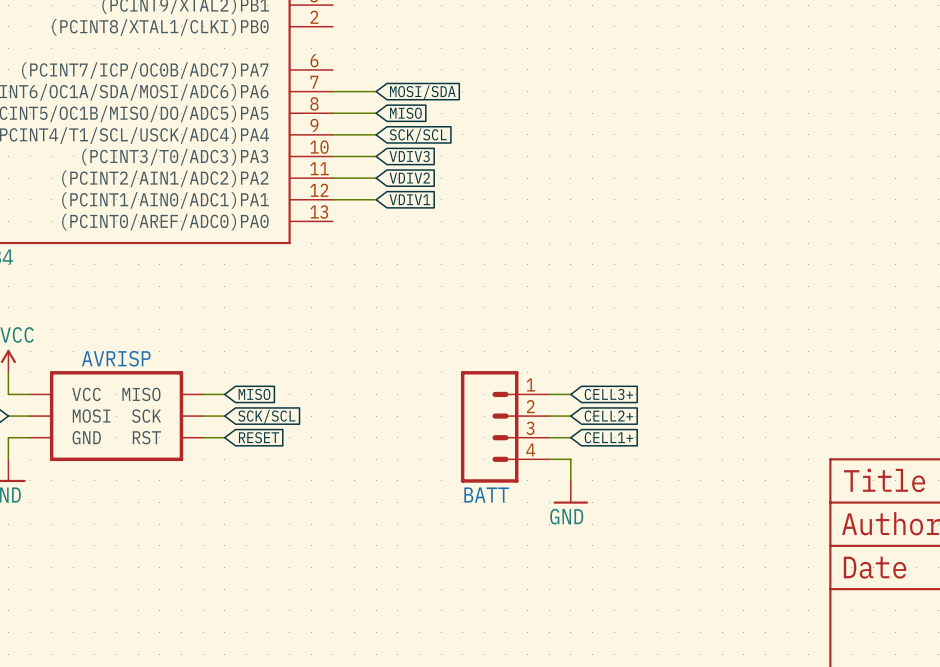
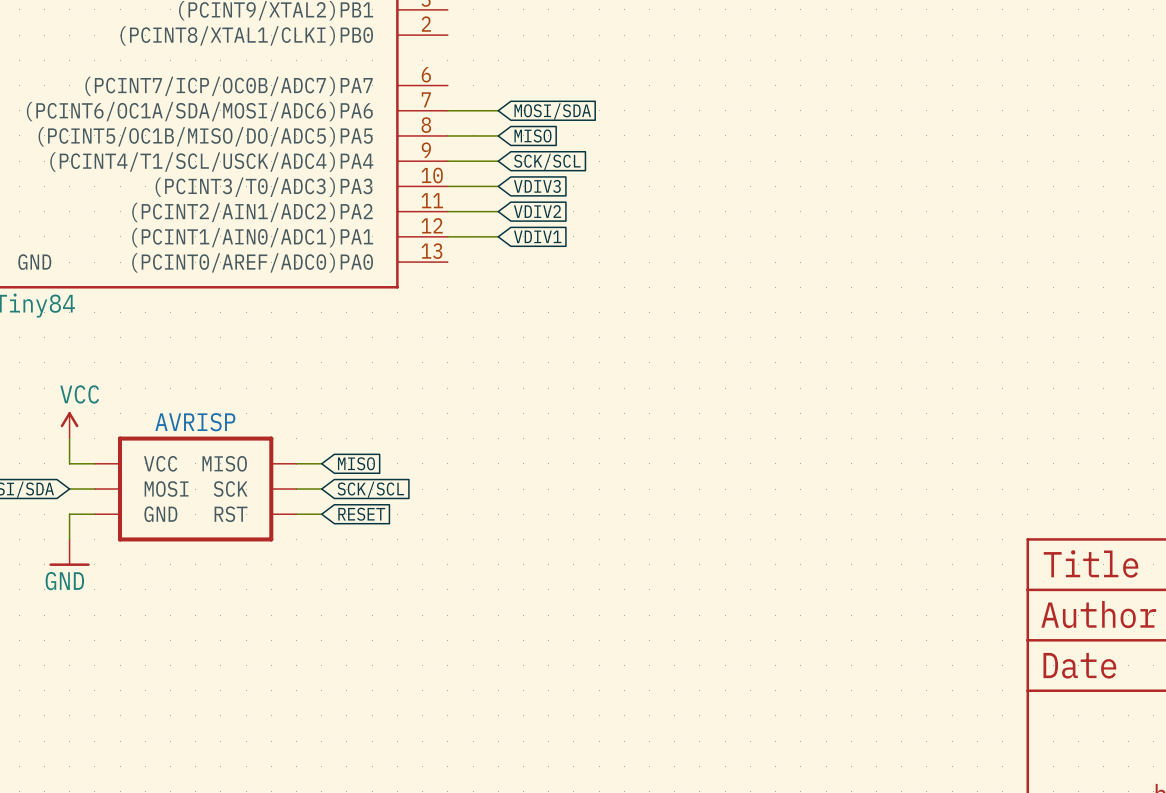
wire: (549, 394) (570, 394) -> none
global label: CELL3+ (608, 394) -> none
wire: (549, 416) (570, 416) -> none
global label: CELL2+ (608, 416) -> none
BATT: (505, 426) -> none
wire: (549, 437) (570, 437) -> none
global label: CELL1+ (608, 437) -> none
wire: (549, 459) (570, 459) (570, 480) -> none
power symbol: GND (570, 492) -> none

